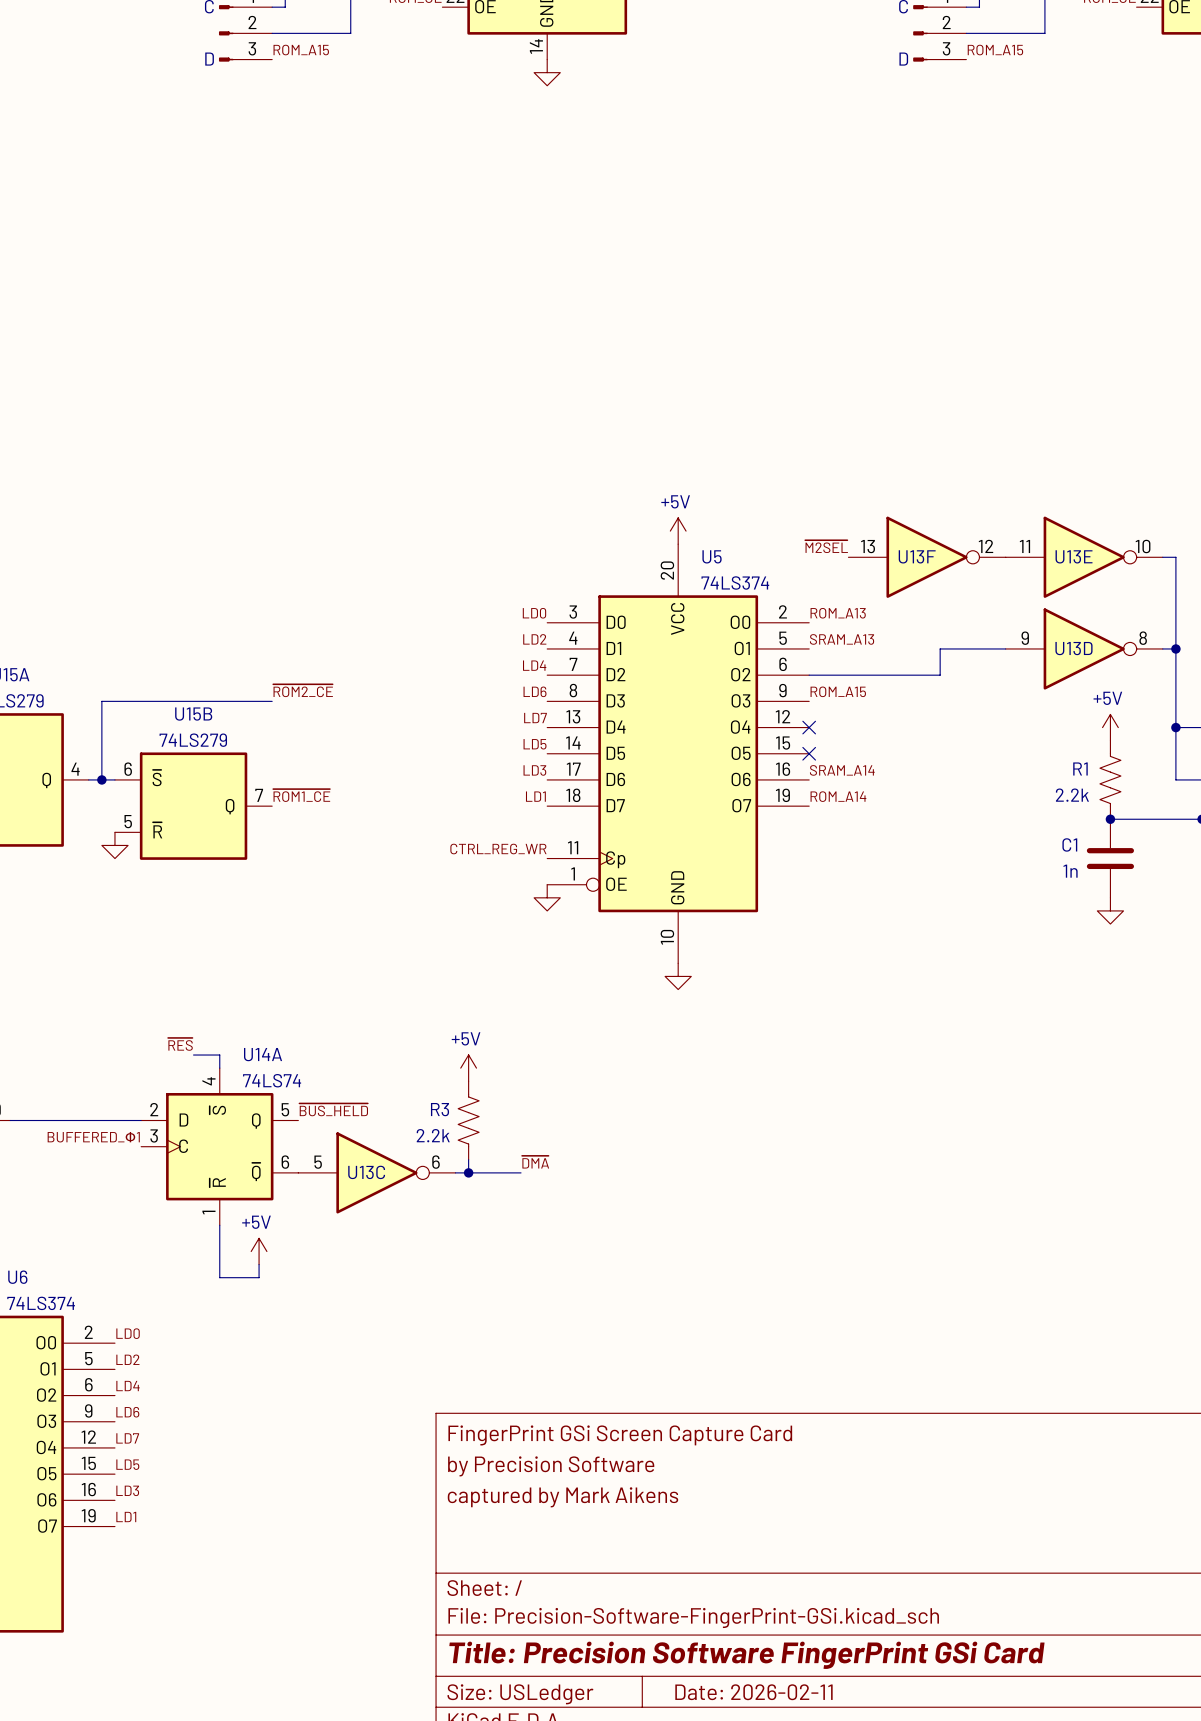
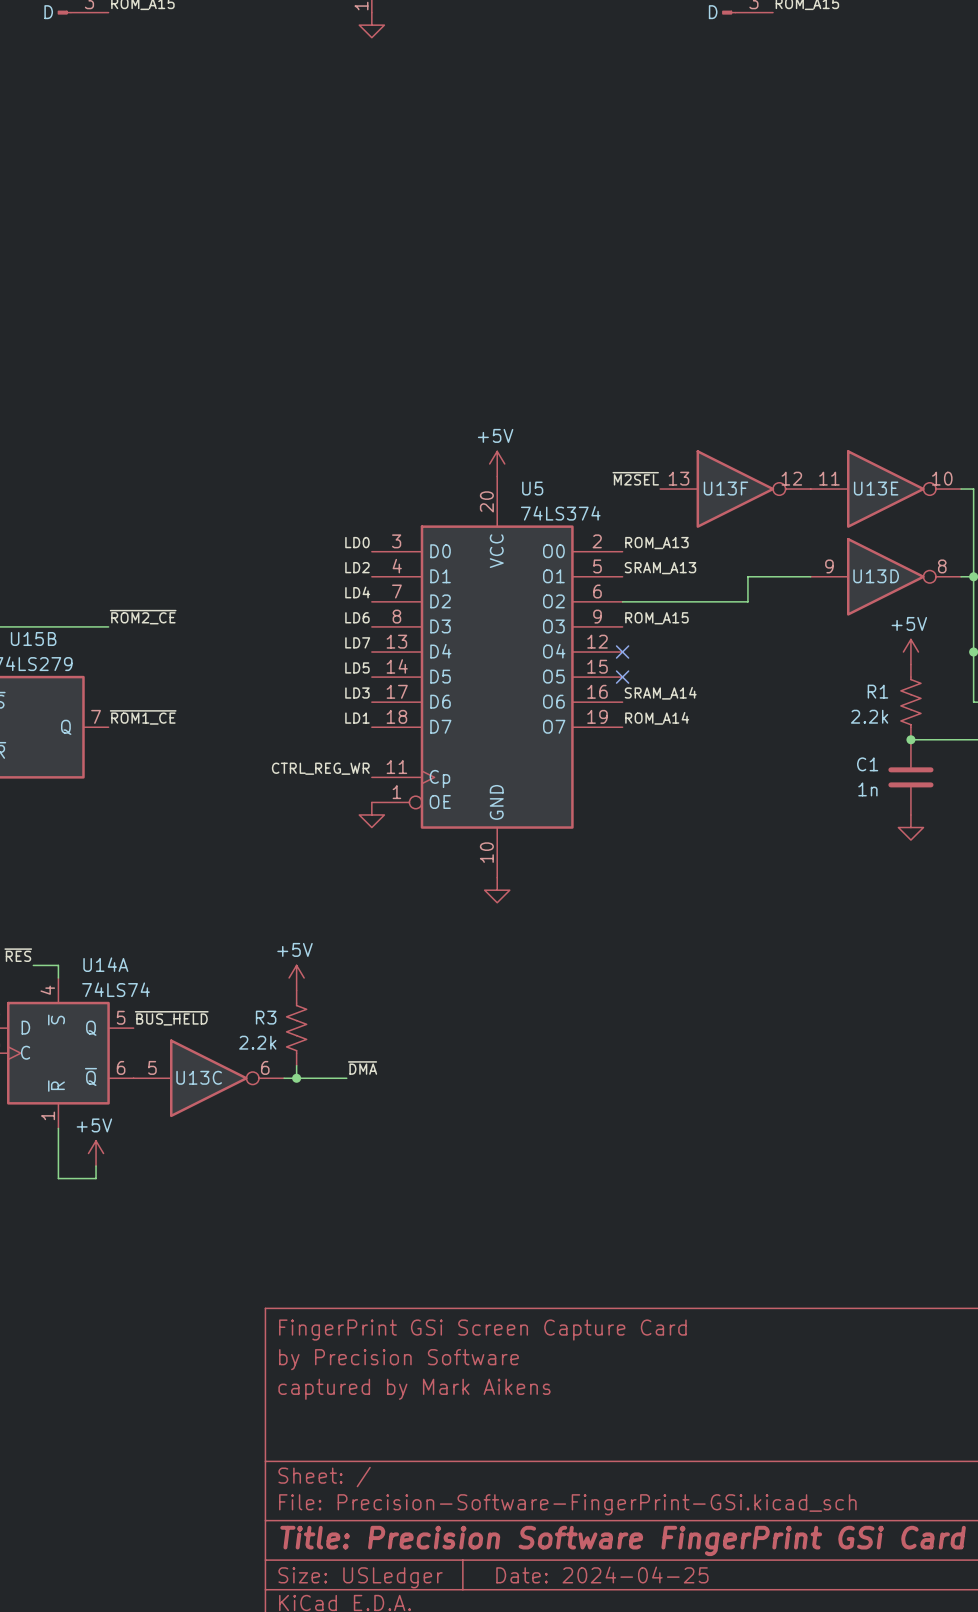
title block: Date: 2026-02-11 (753, 1692) -> Date: 2024-04-25 (602, 1574)

